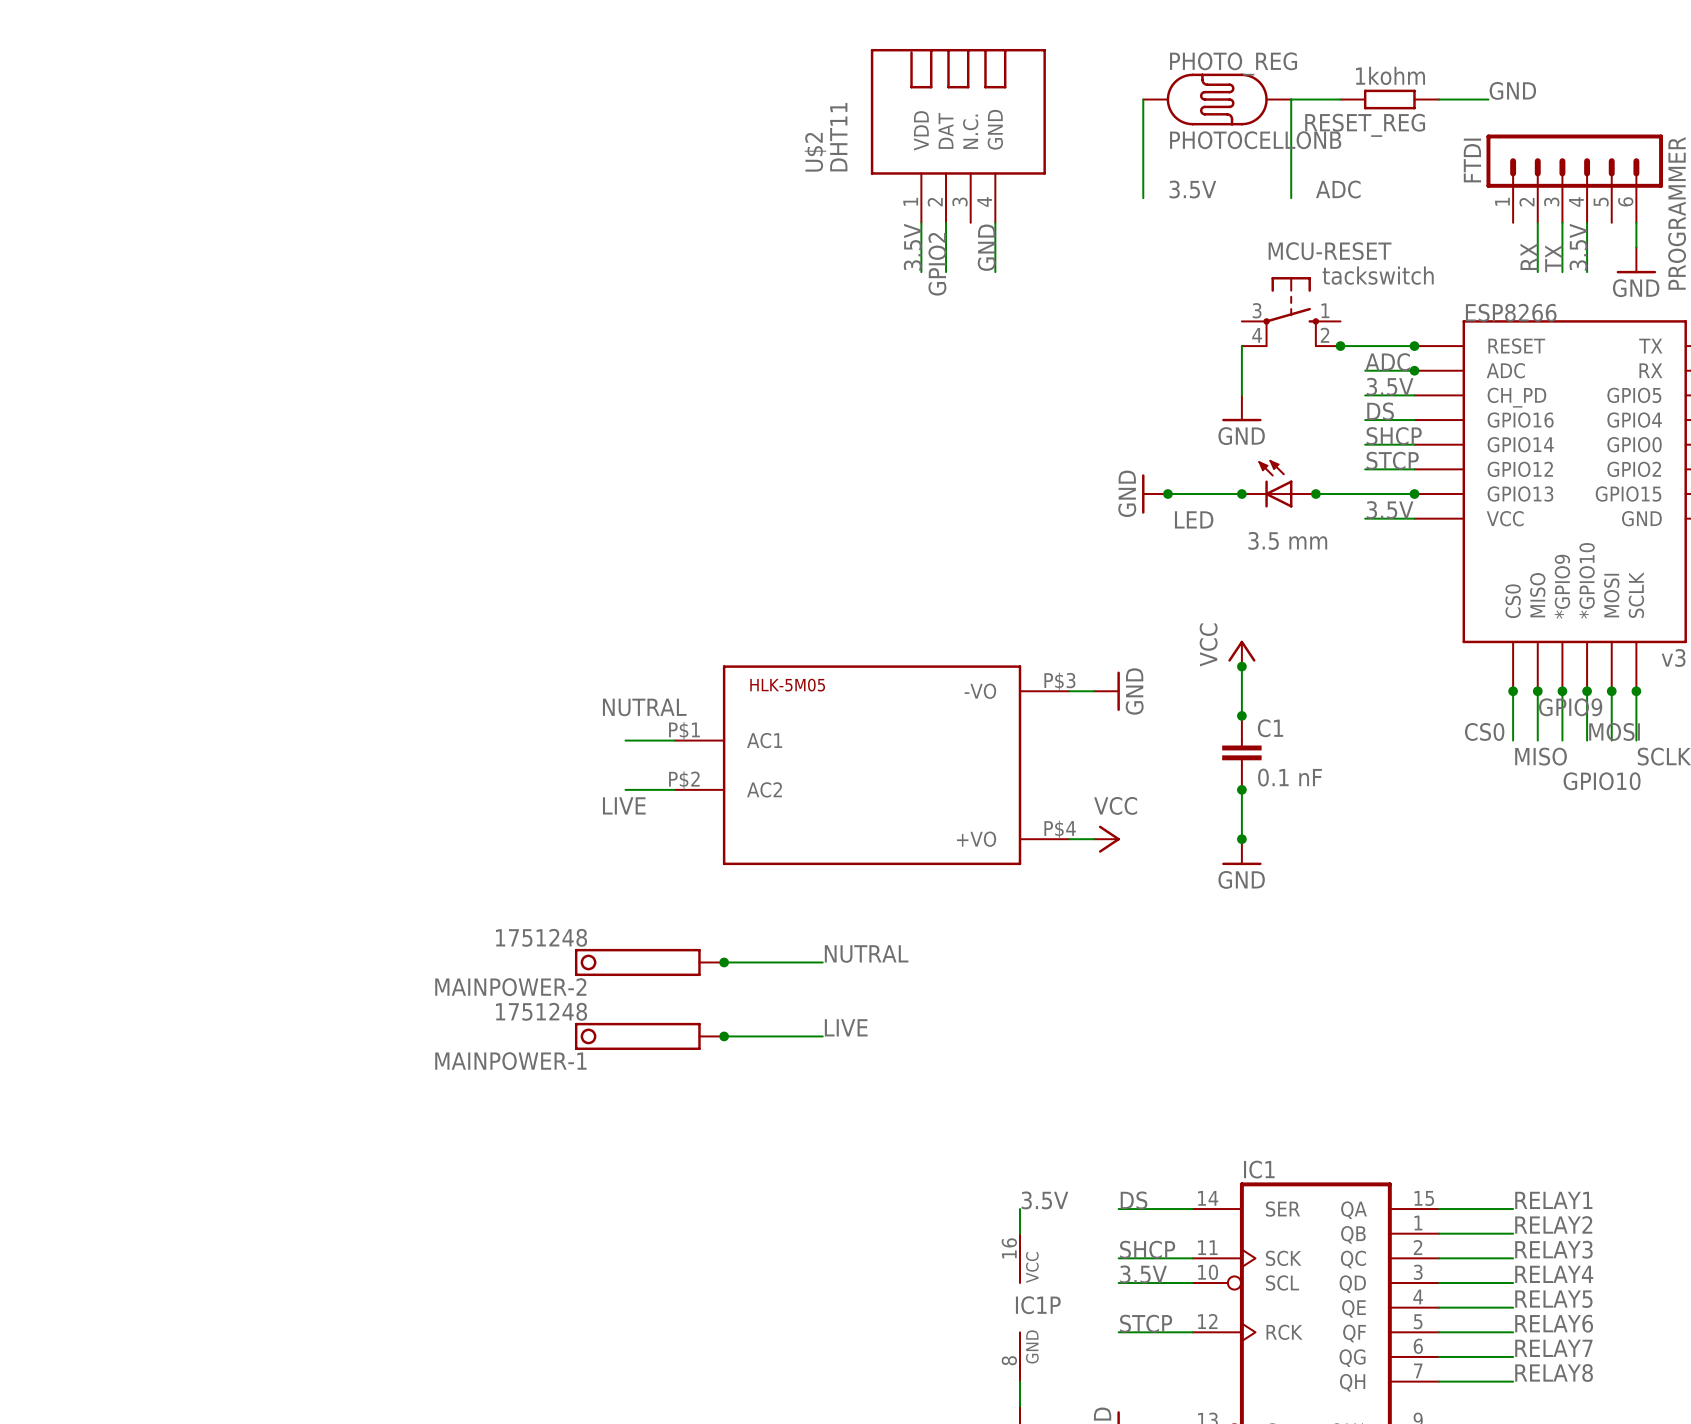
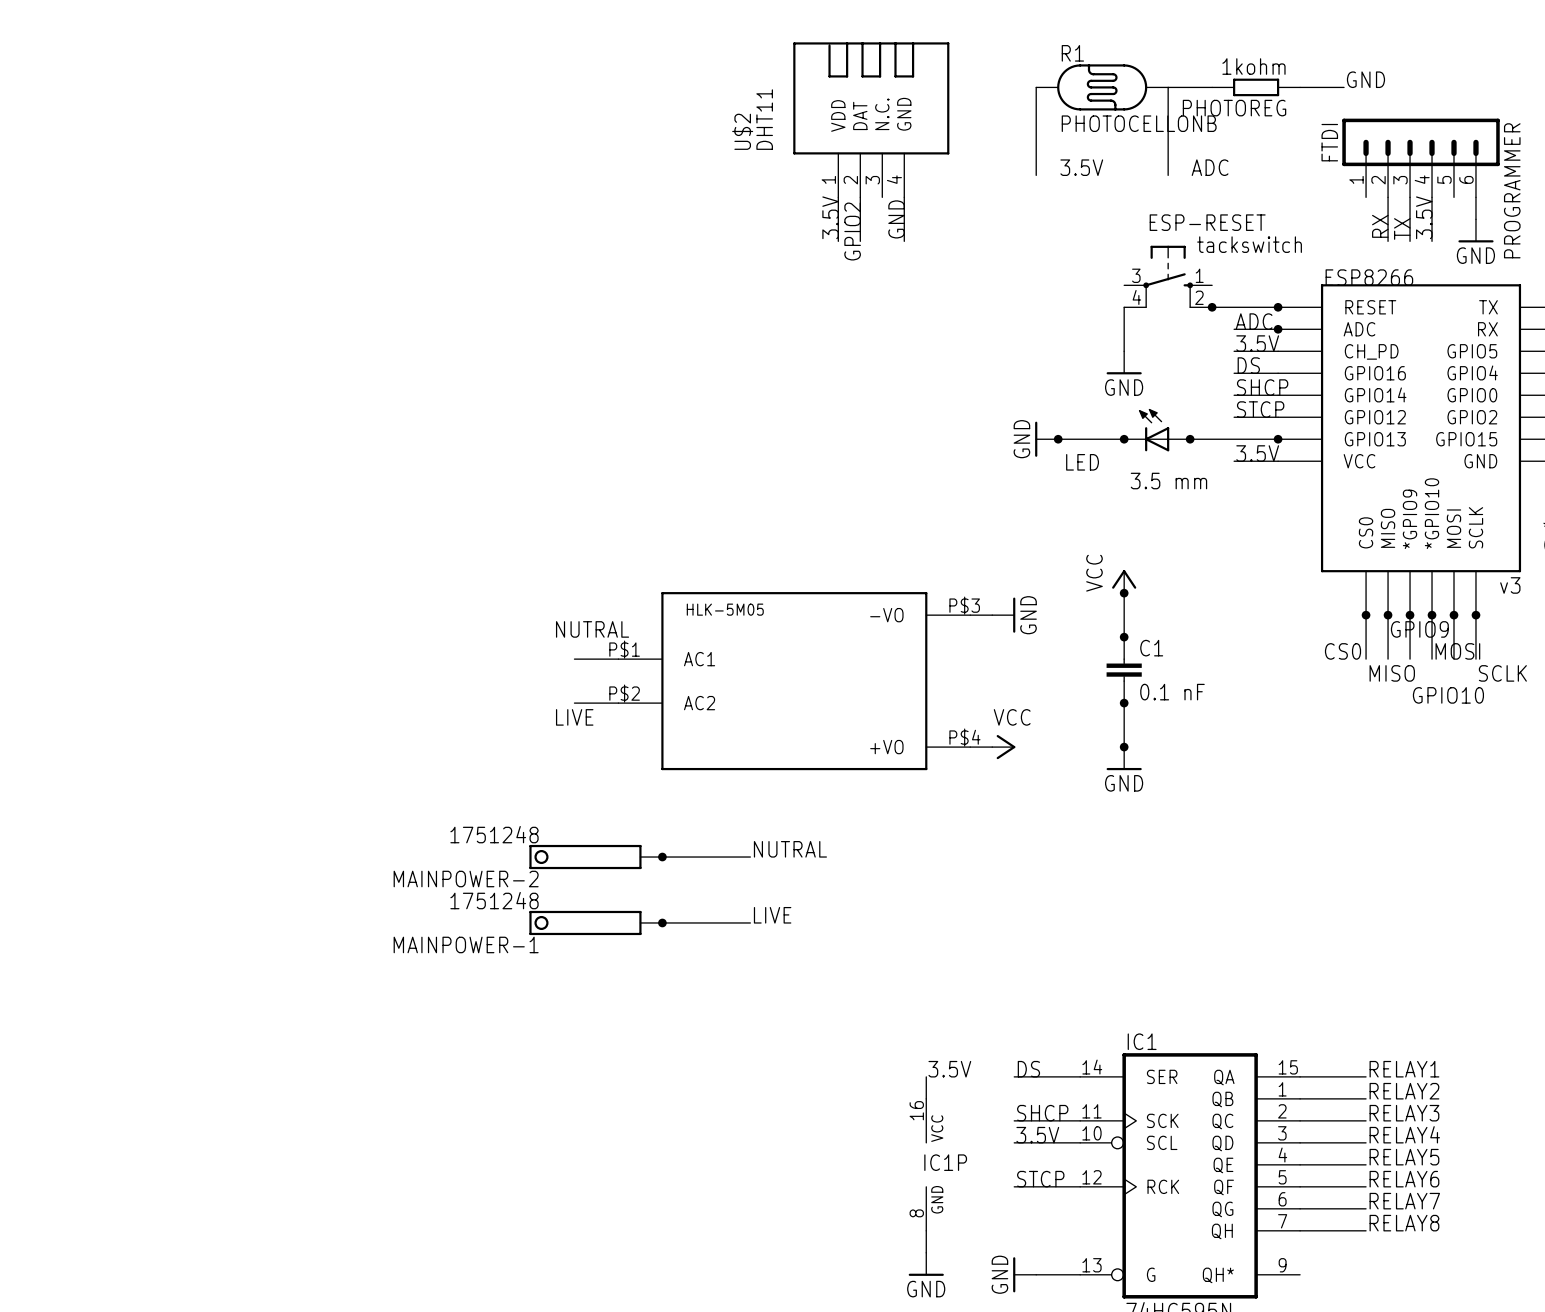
PHOTO_REG name: PHOTO_REG (1233, 63) -> R1 (1072, 53)
RESET_REG name: RESET_REG (1365, 125) -> PHOTOREG (1234, 108)
MCU-RESET name: MCU-RESET (1330, 251) -> ESP-RESET (1207, 222)

